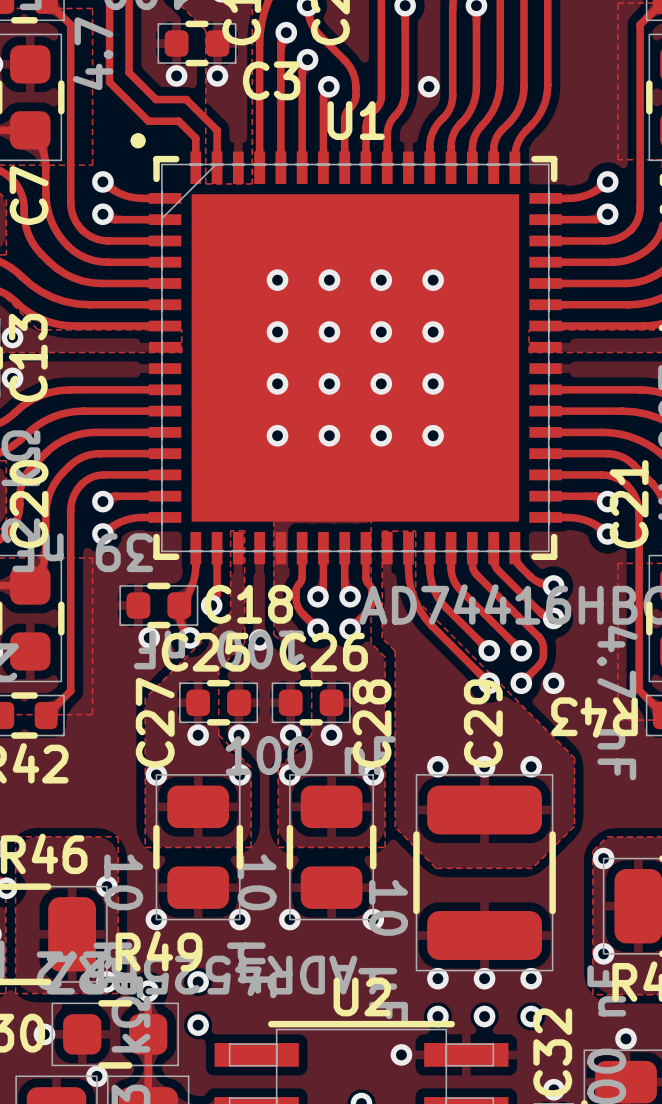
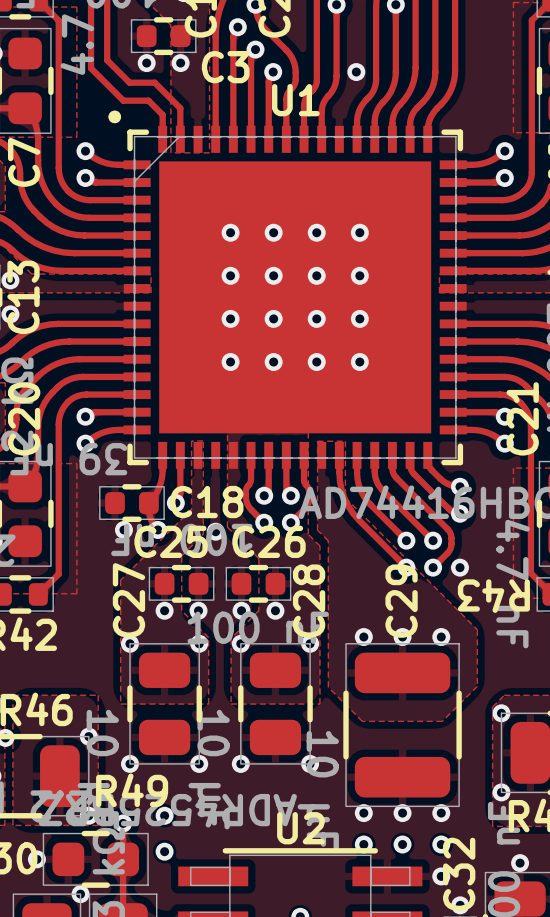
via position: (401, 1054) -> (441, 876)

